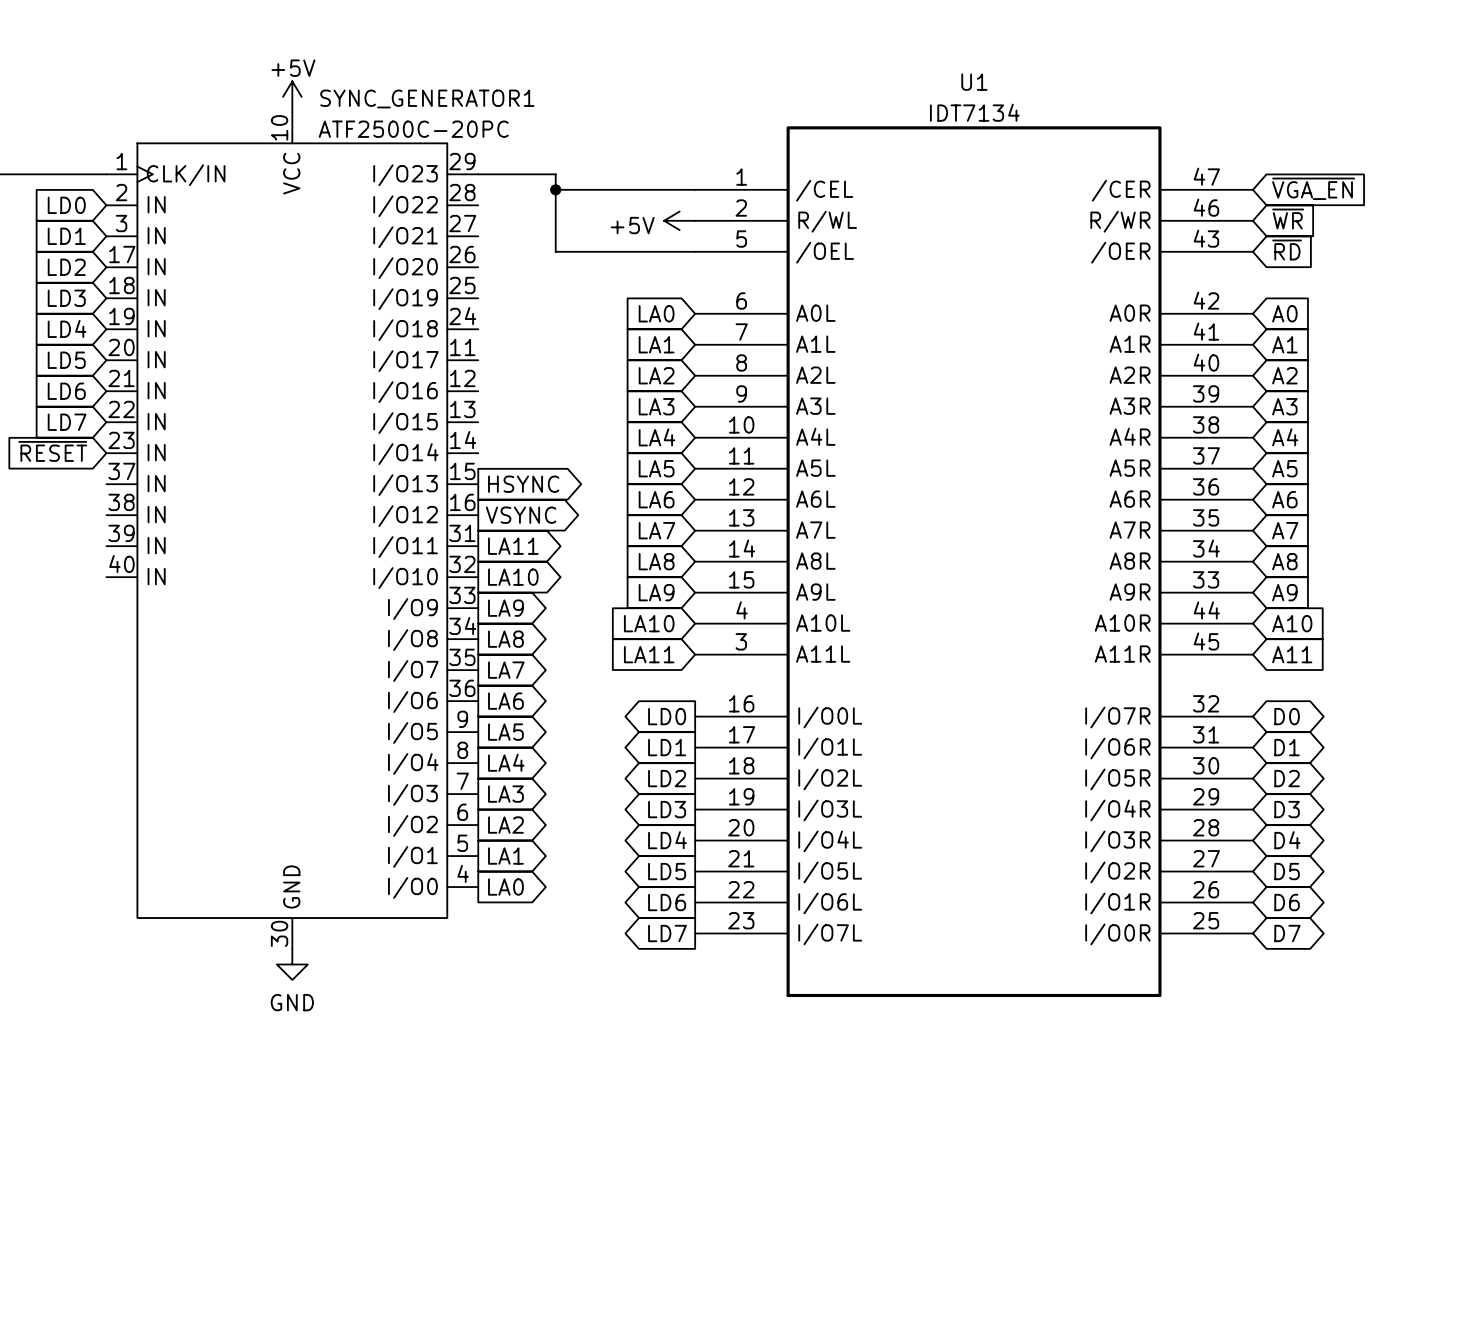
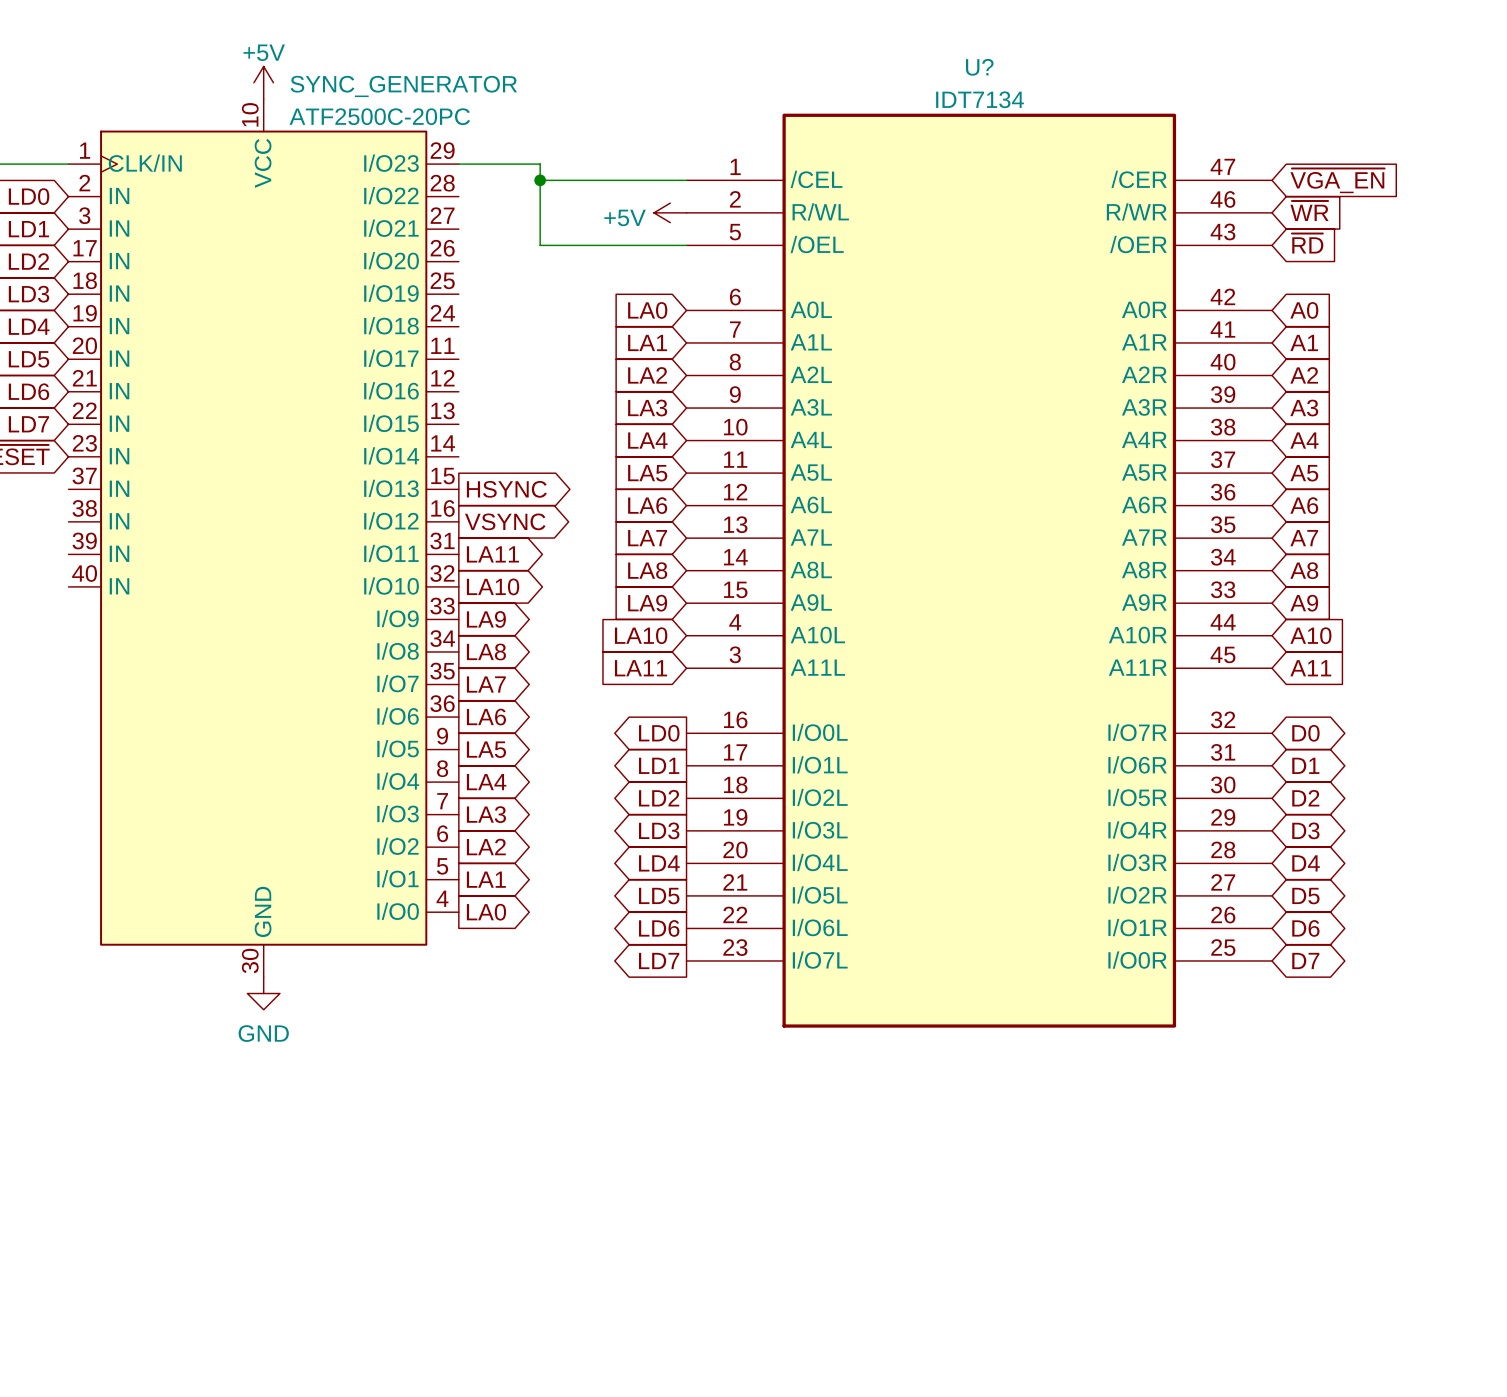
U1 name: U1 (974, 82) -> U? (979, 67)
SYNC_GENERATOR1 name: SYNC_GENERATOR1 (427, 98) -> SYNC_GENERATOR (403, 86)

